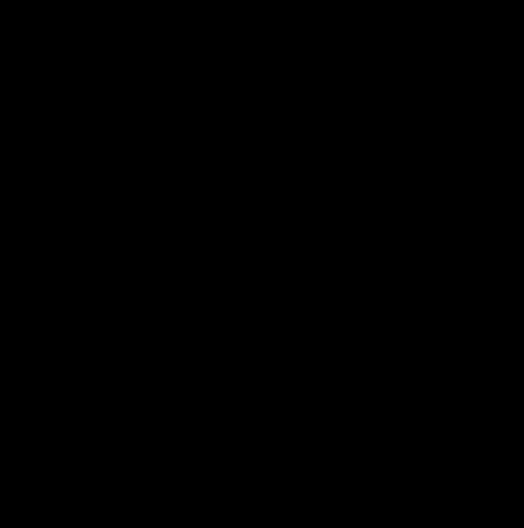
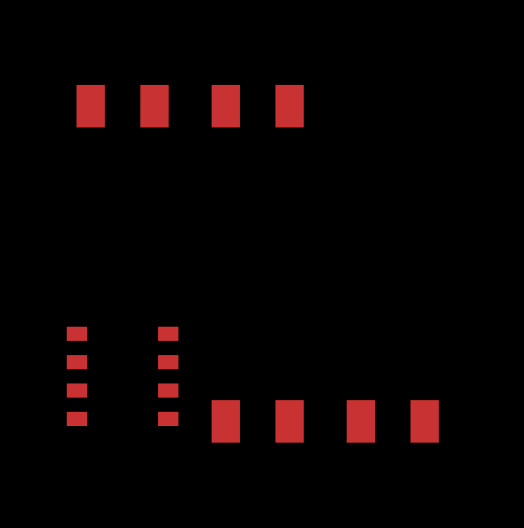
part: none -> (122, 106)
part: none -> (257, 106)
part: none -> (122, 376)
part: none -> (257, 421)
part: none -> (392, 421)

